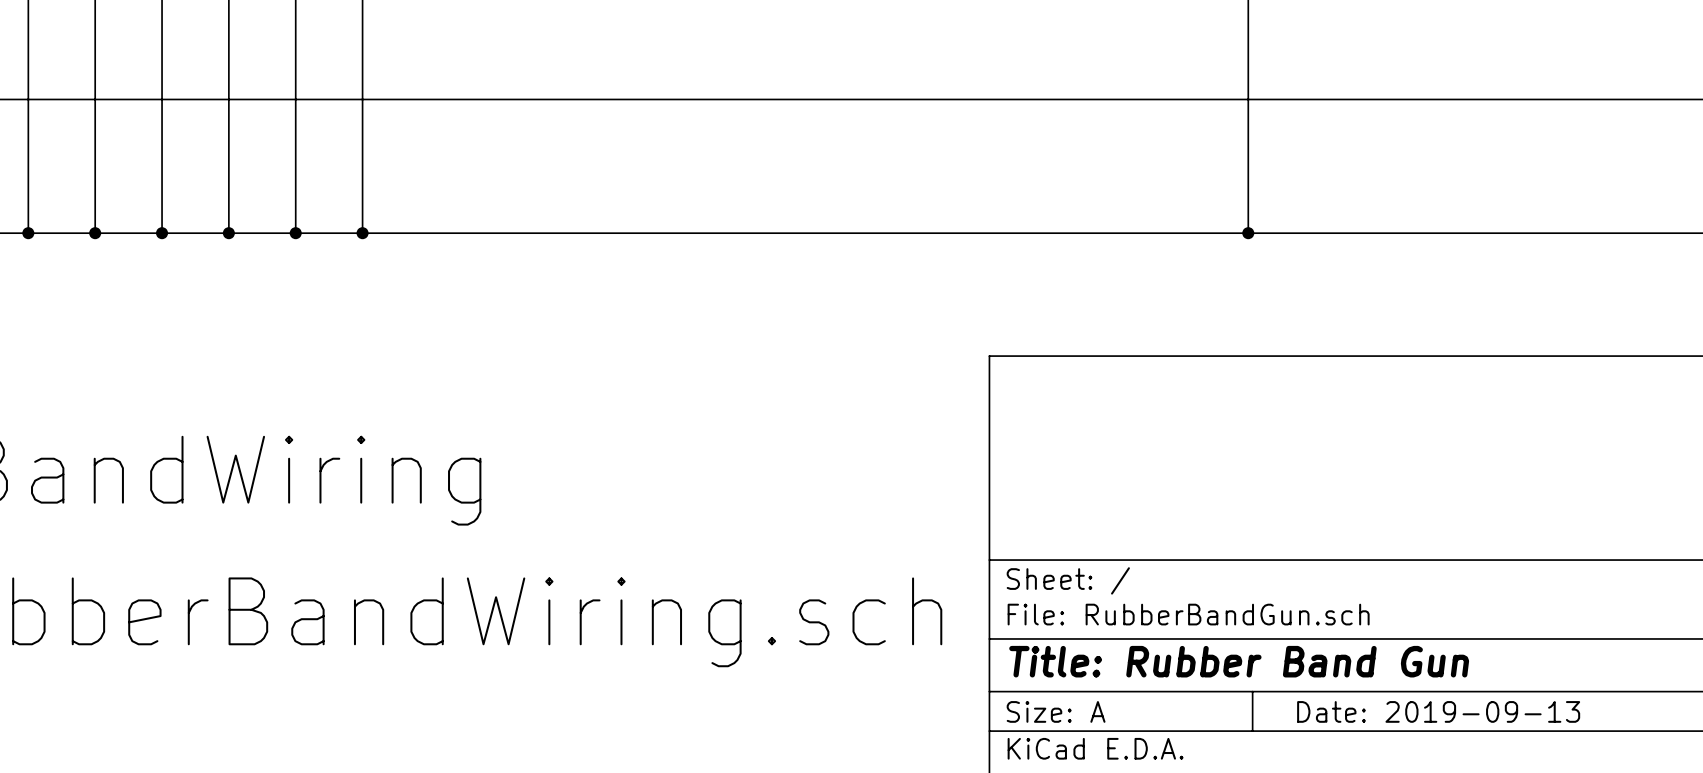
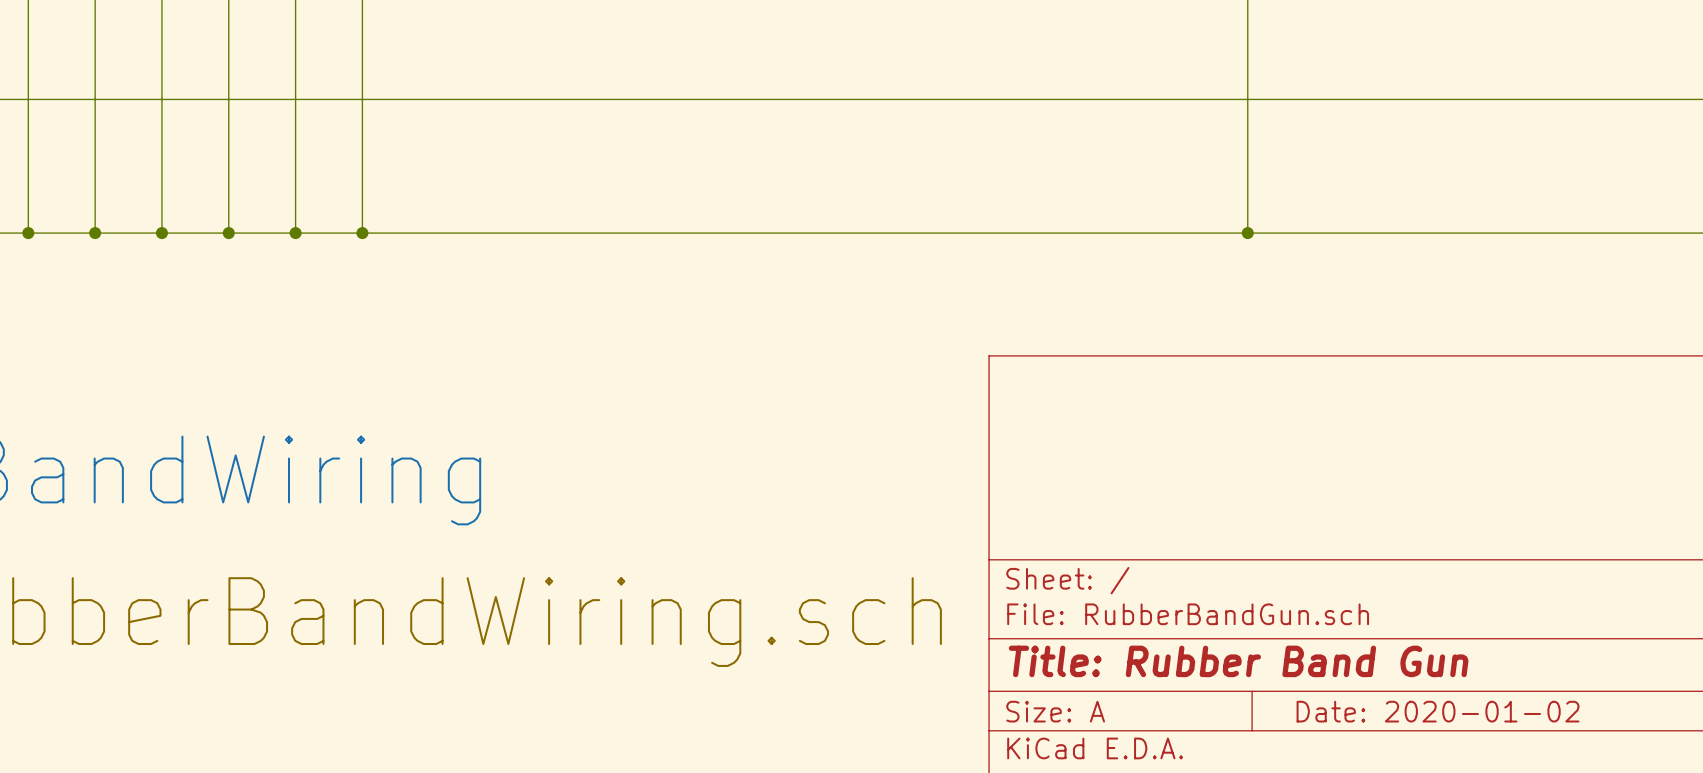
title block: Date: 2019-09-13 (1438, 711) -> Date: 2020-01-02 (1438, 711)

